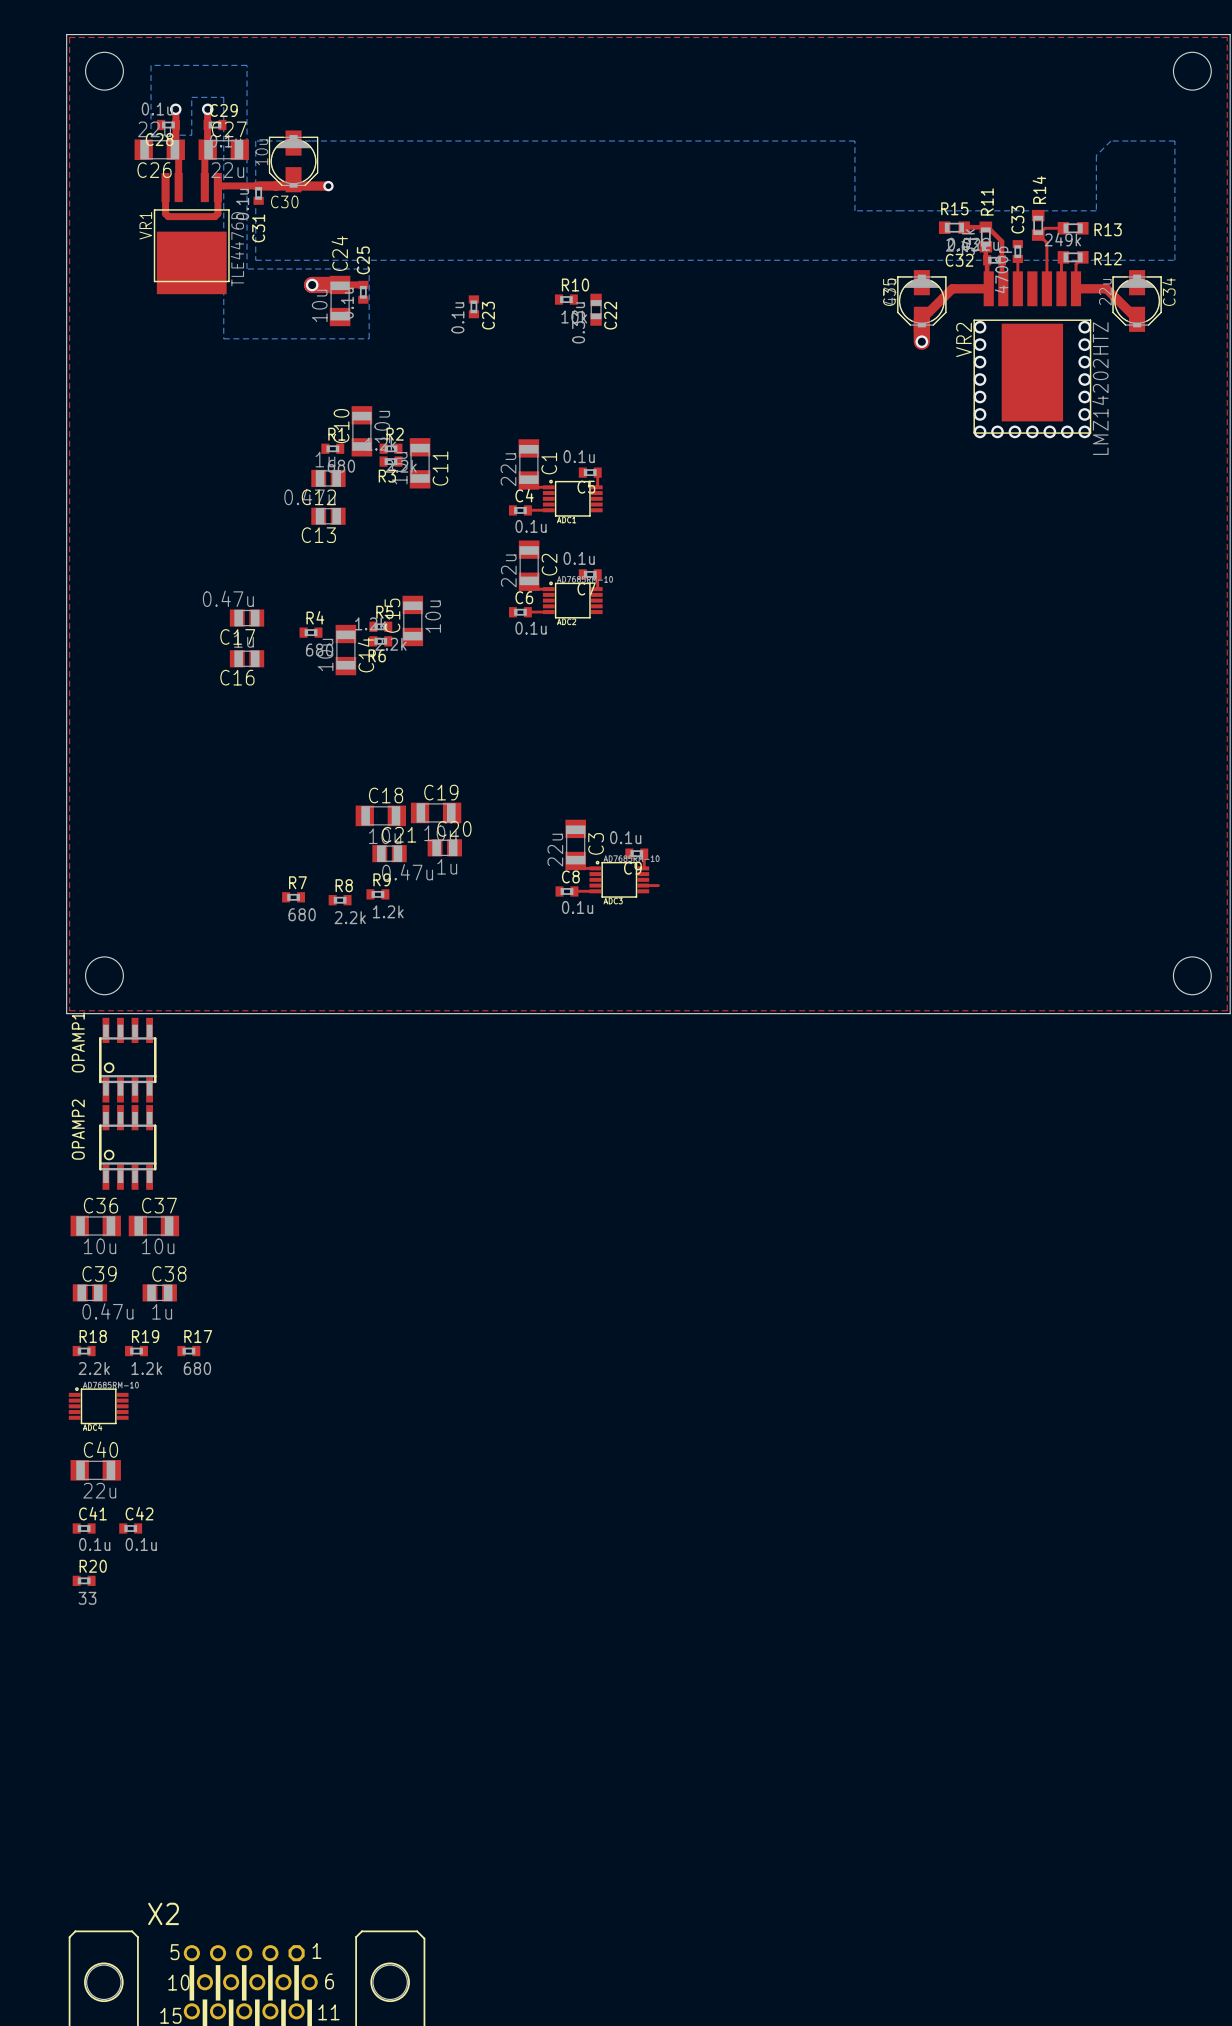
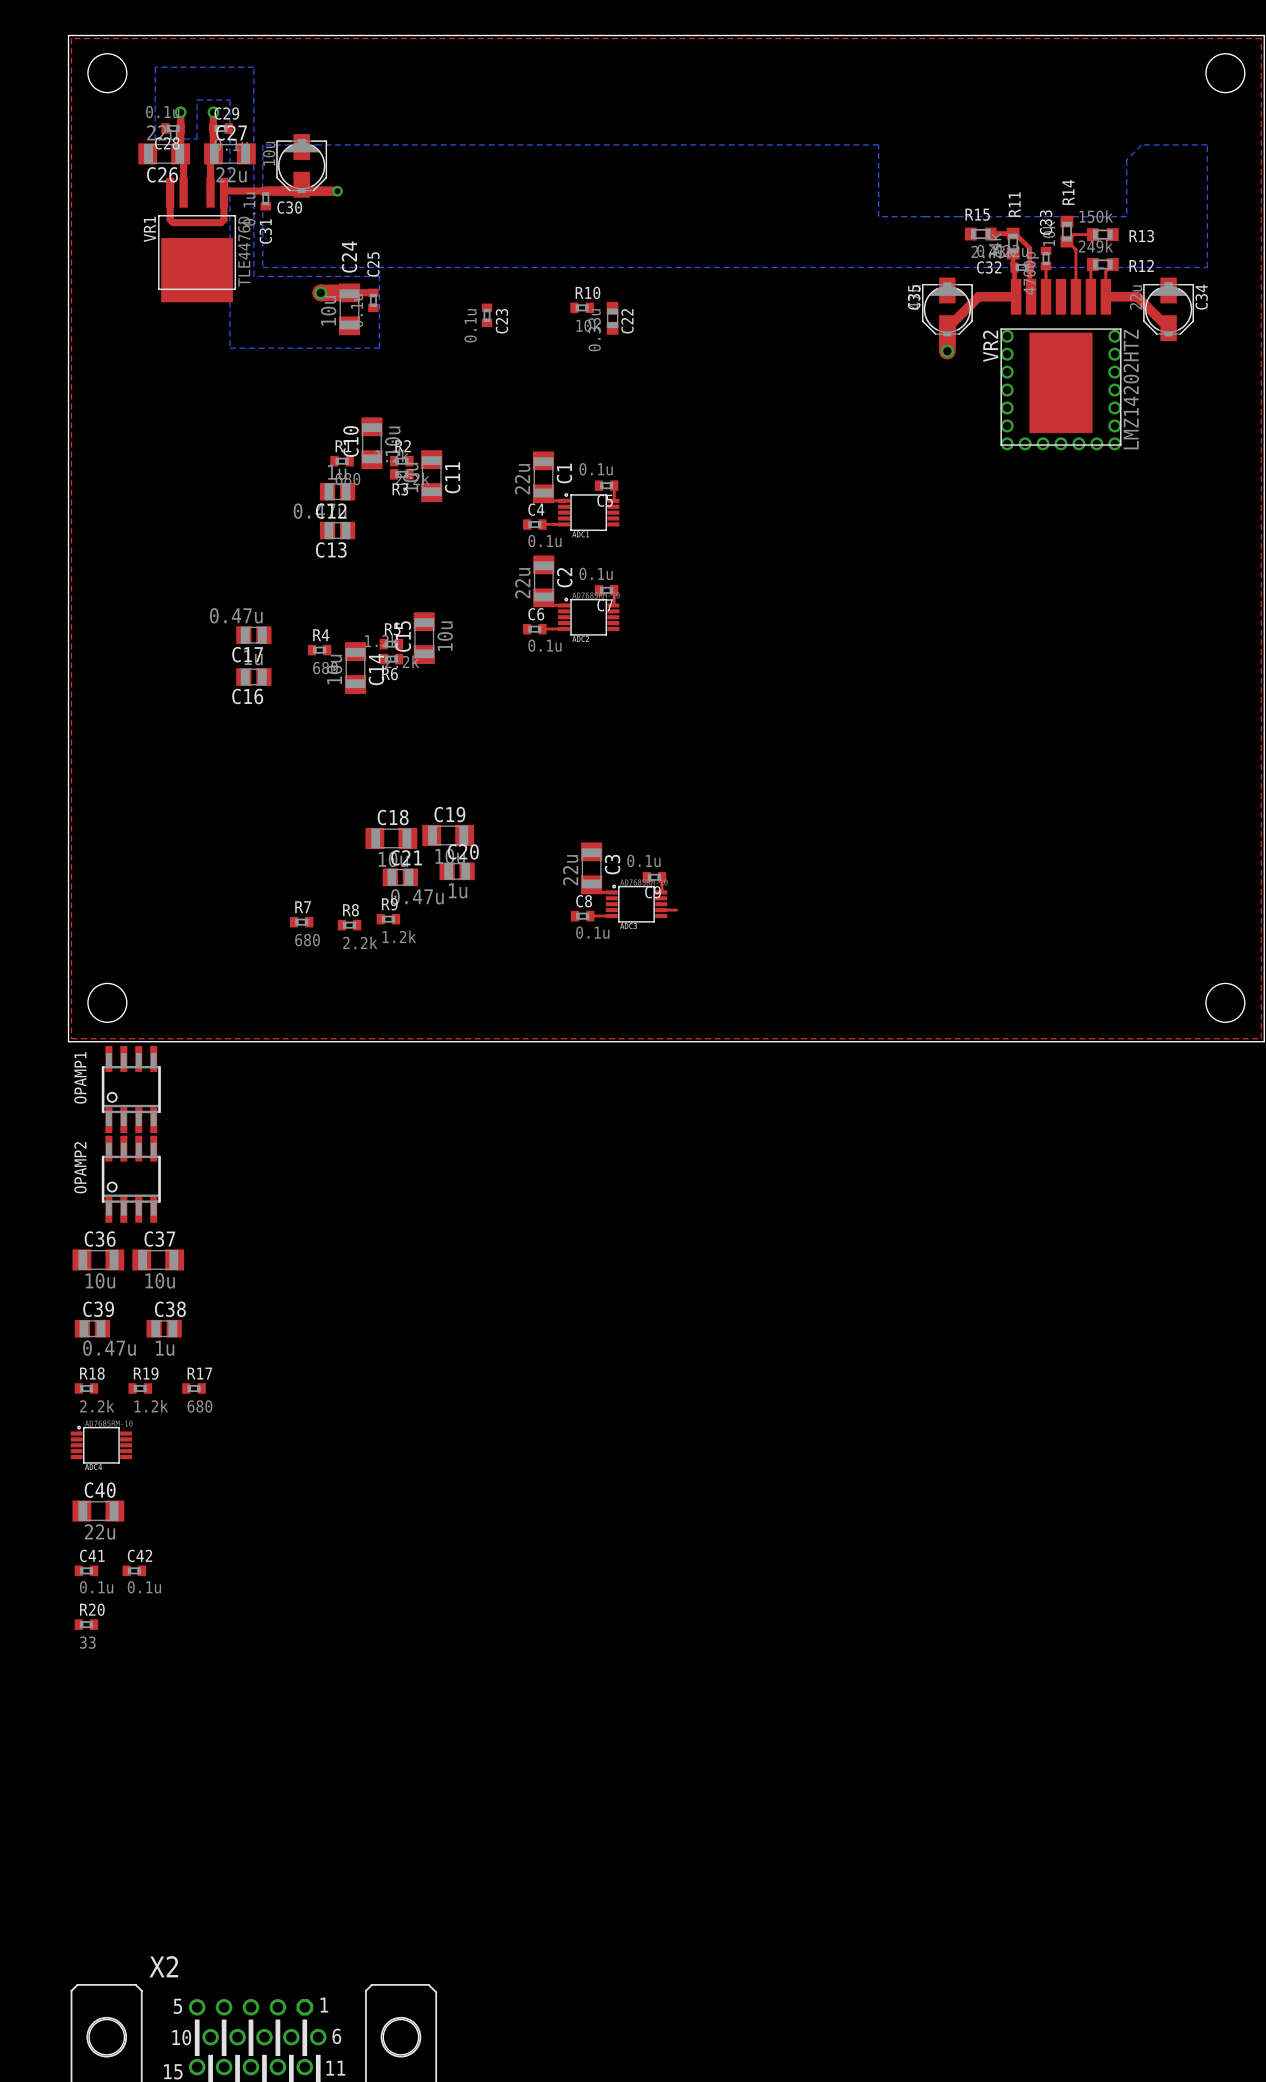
R13 value: none -> 150k (1096, 216)
R14 value: none -> 10k (1048, 233)

